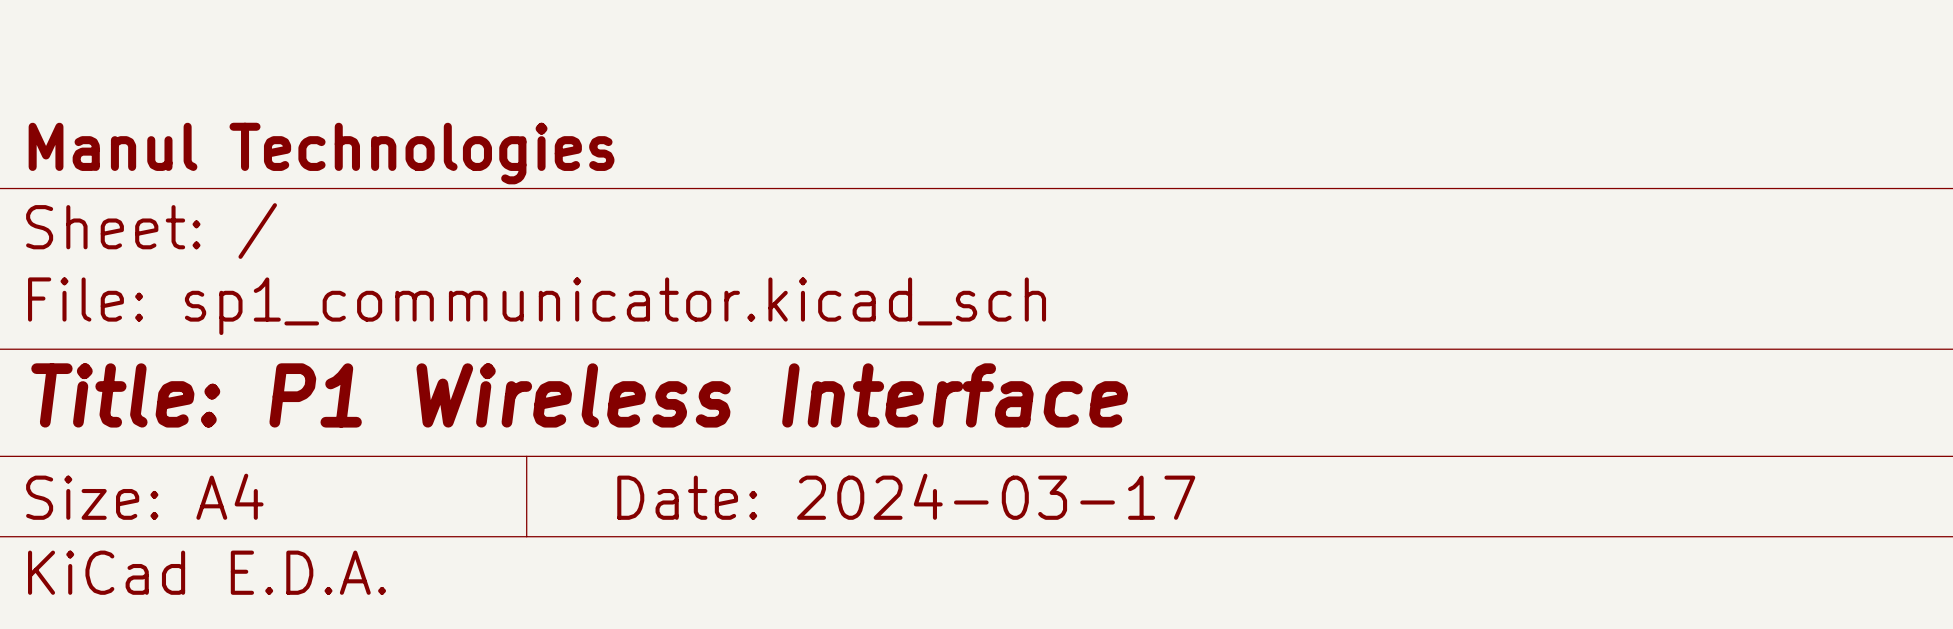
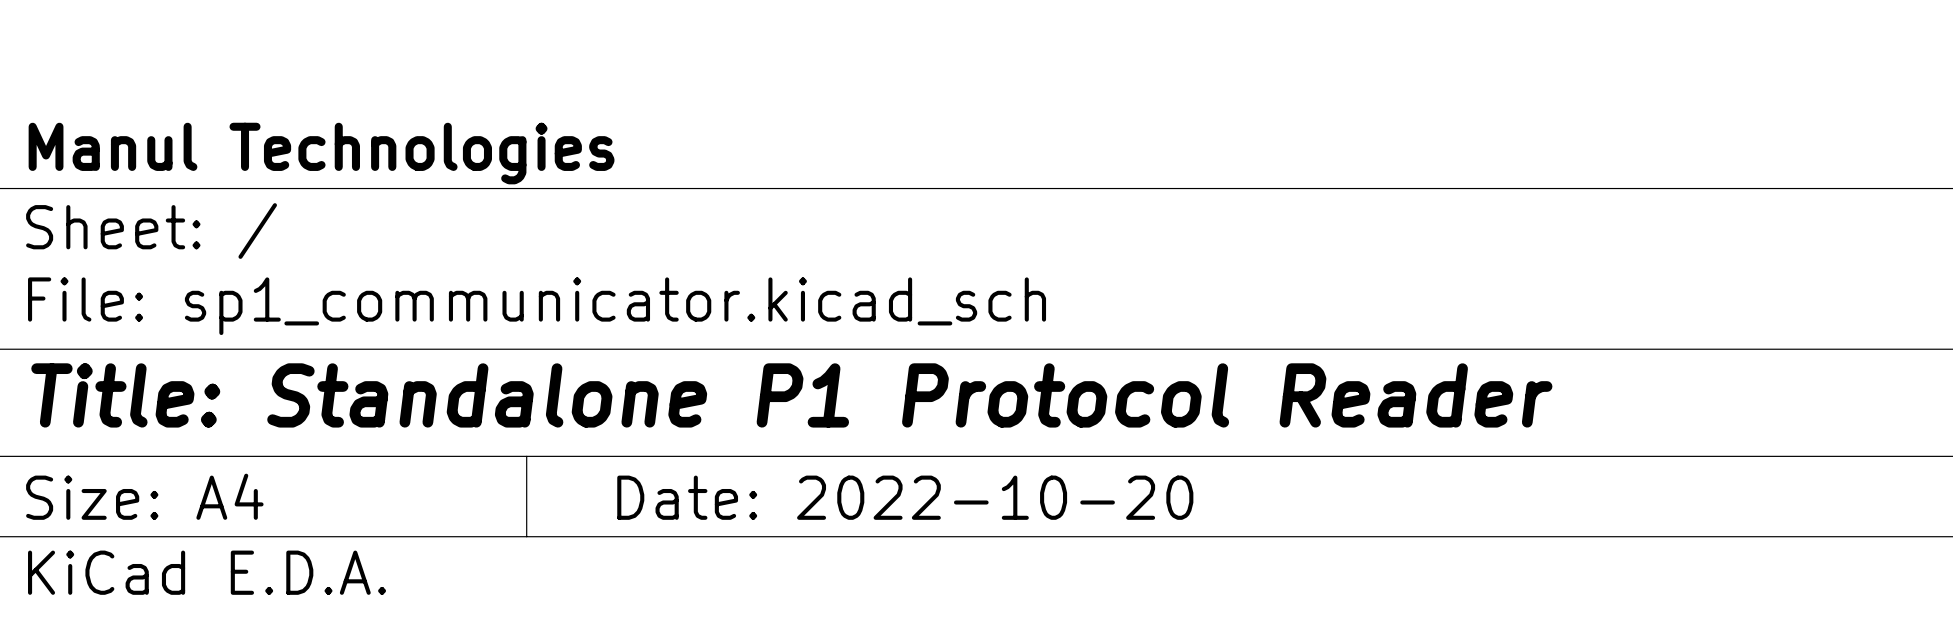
title block: Title: P1 Wireless Interface (579, 395) -> Title: Standalone P1 Protocol Reader (791, 395)
title block: Date: 2024-03-17 (906, 496) -> Date: 2022-10-20 (905, 497)

